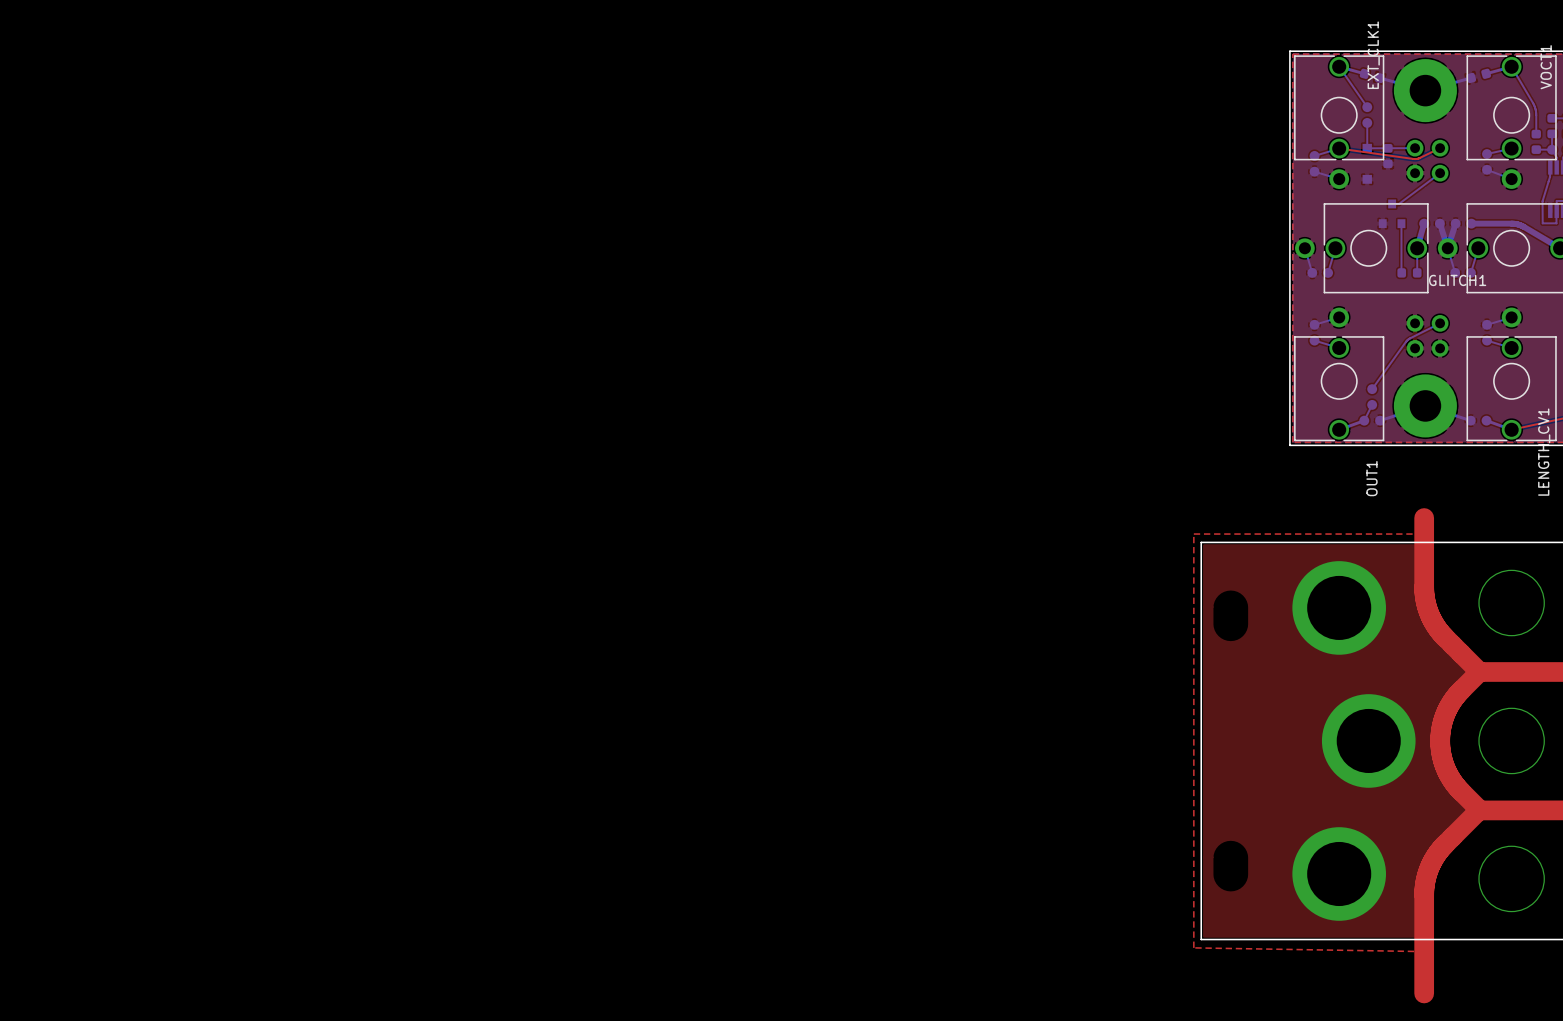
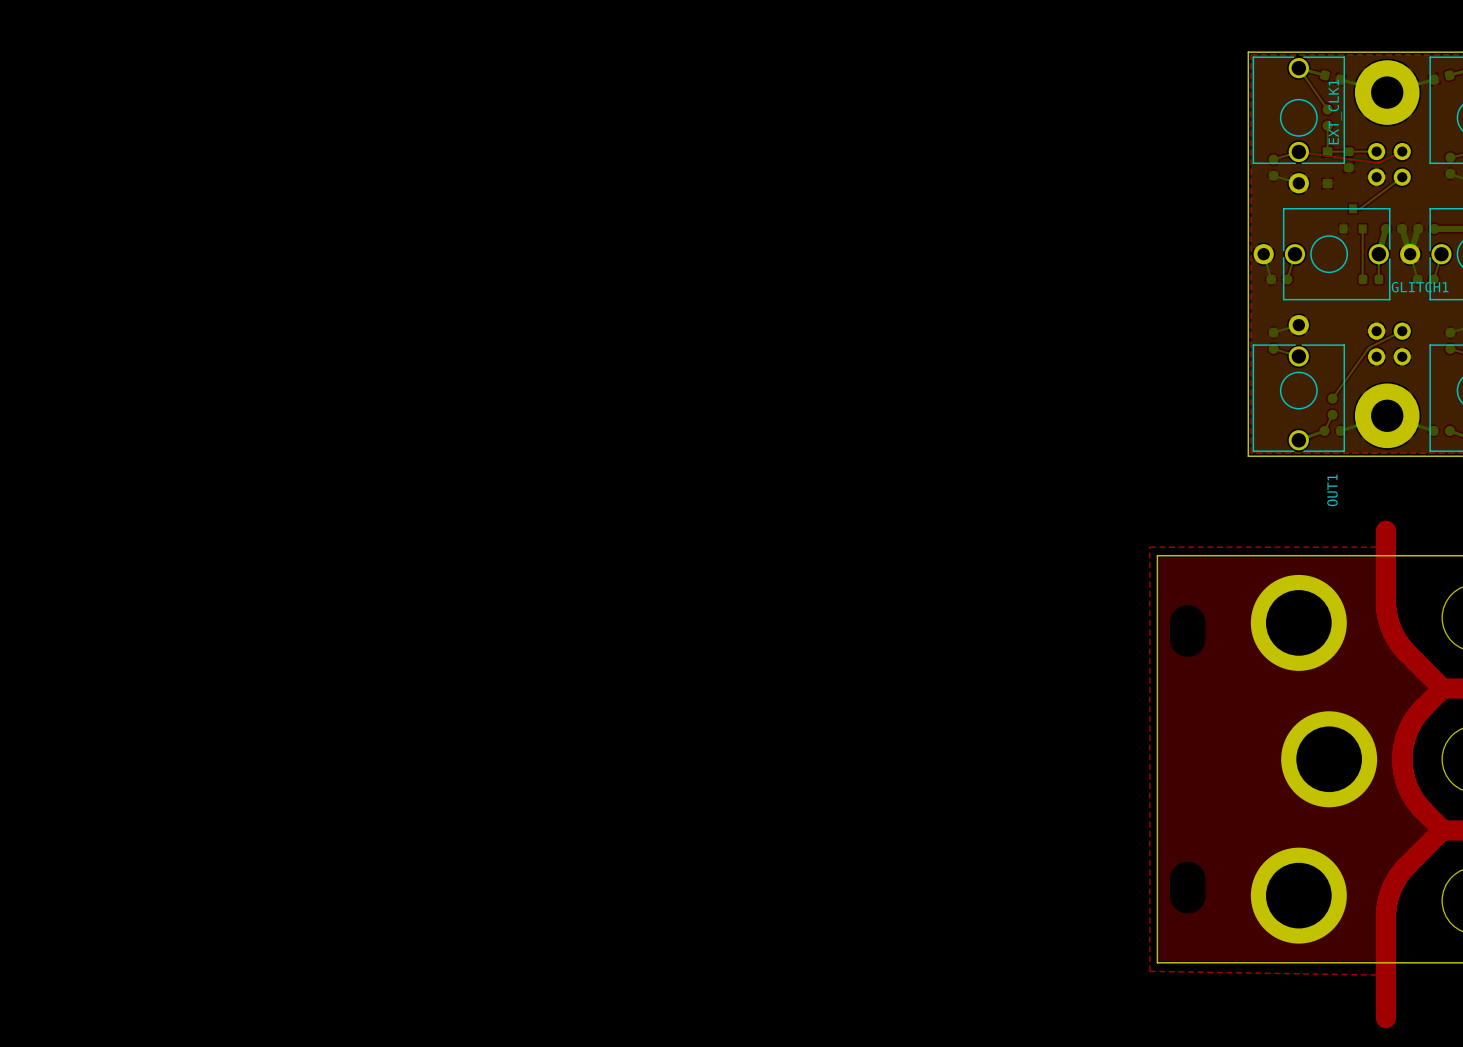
EXT_CLK1 name position: EXT_CLK1 (1373, 55) -> EXT_CLK1 (1335, 112)

